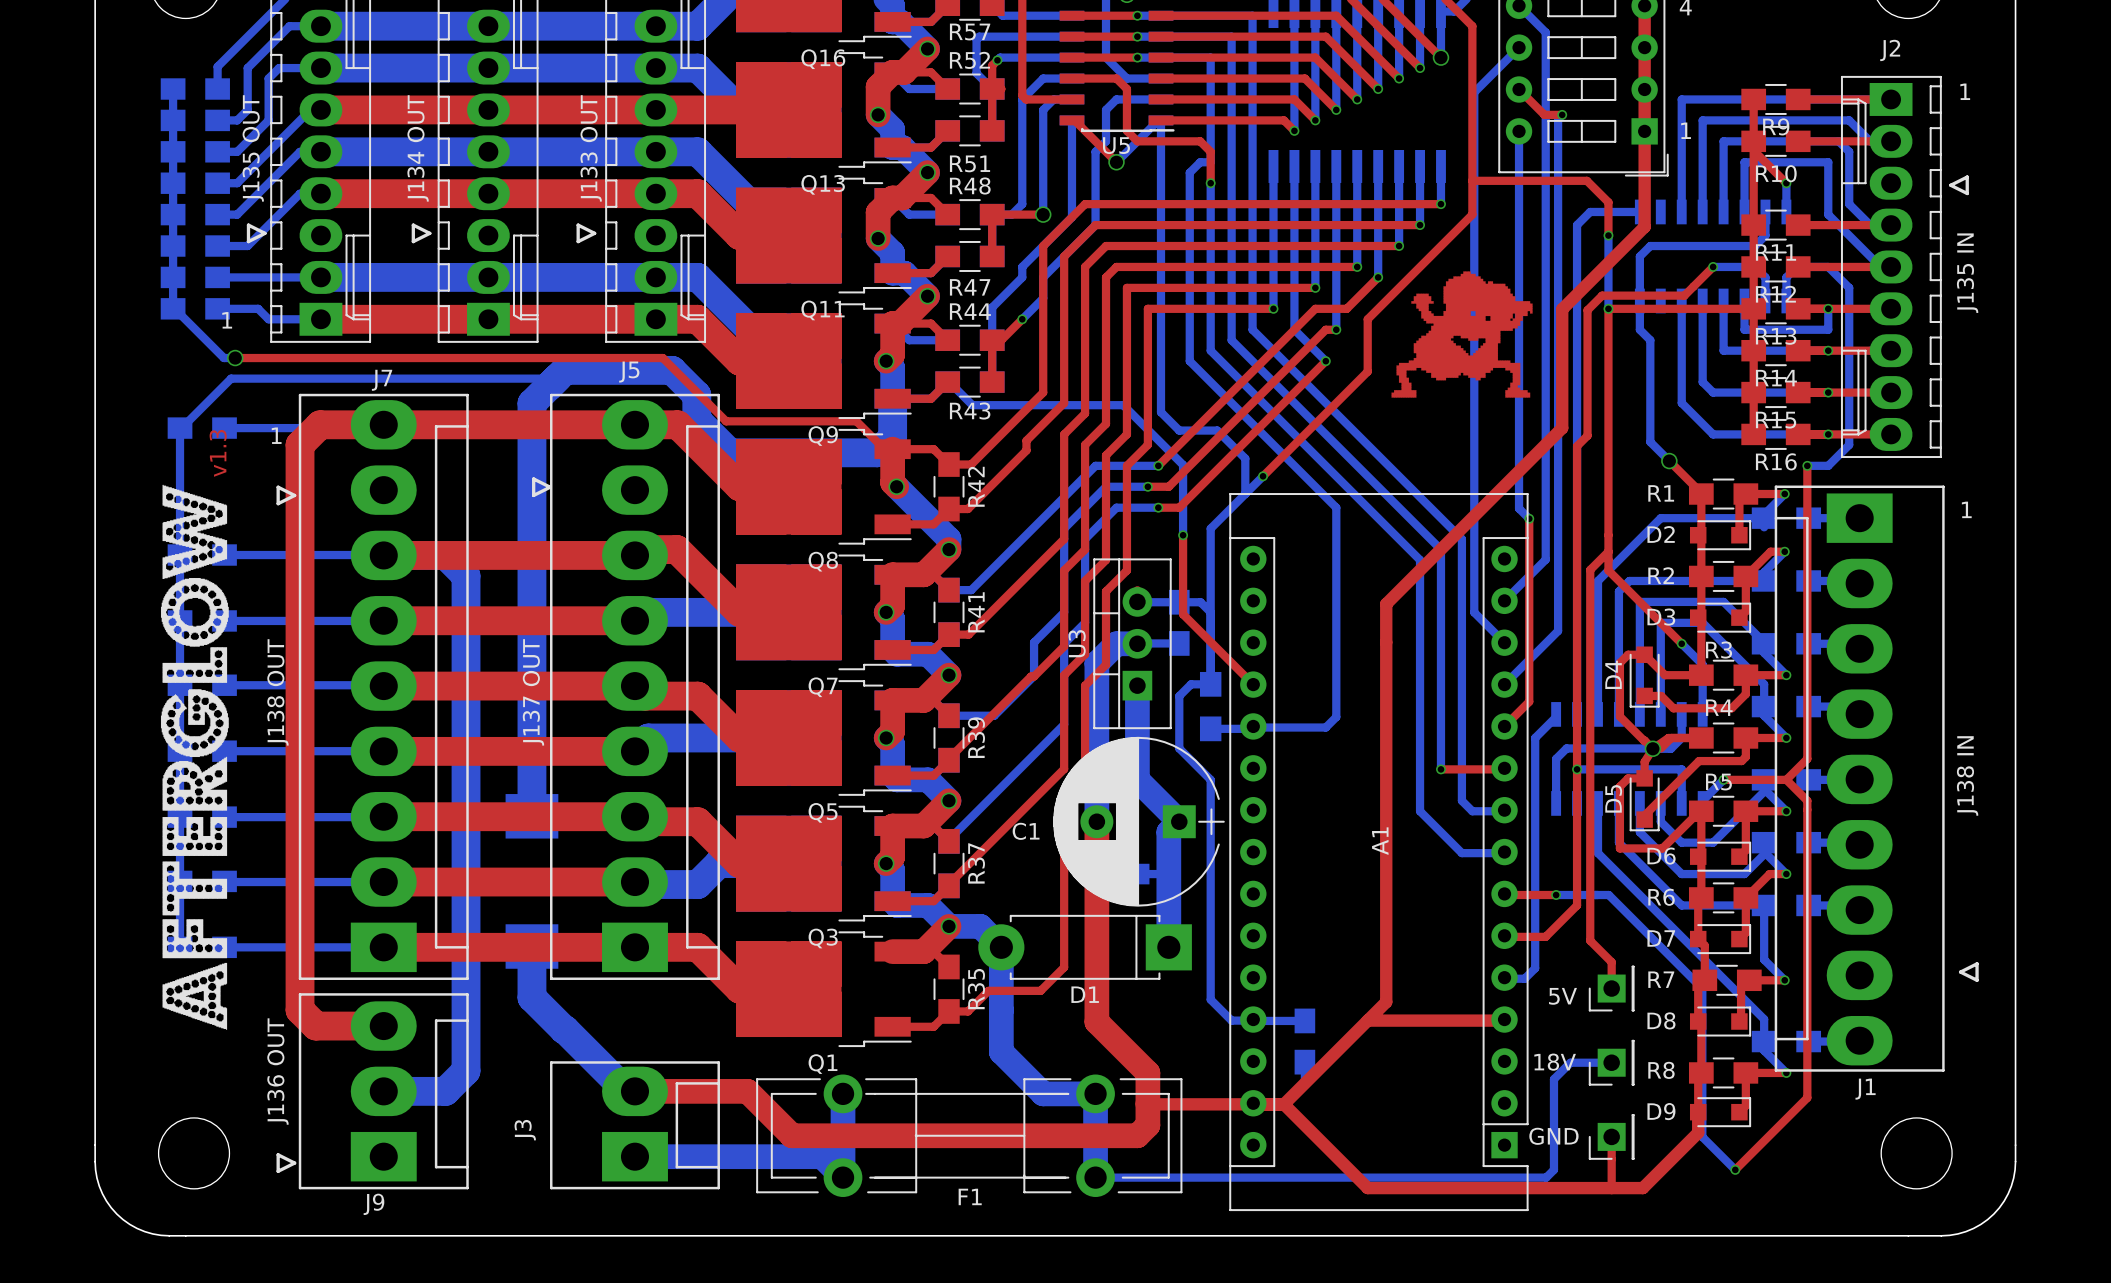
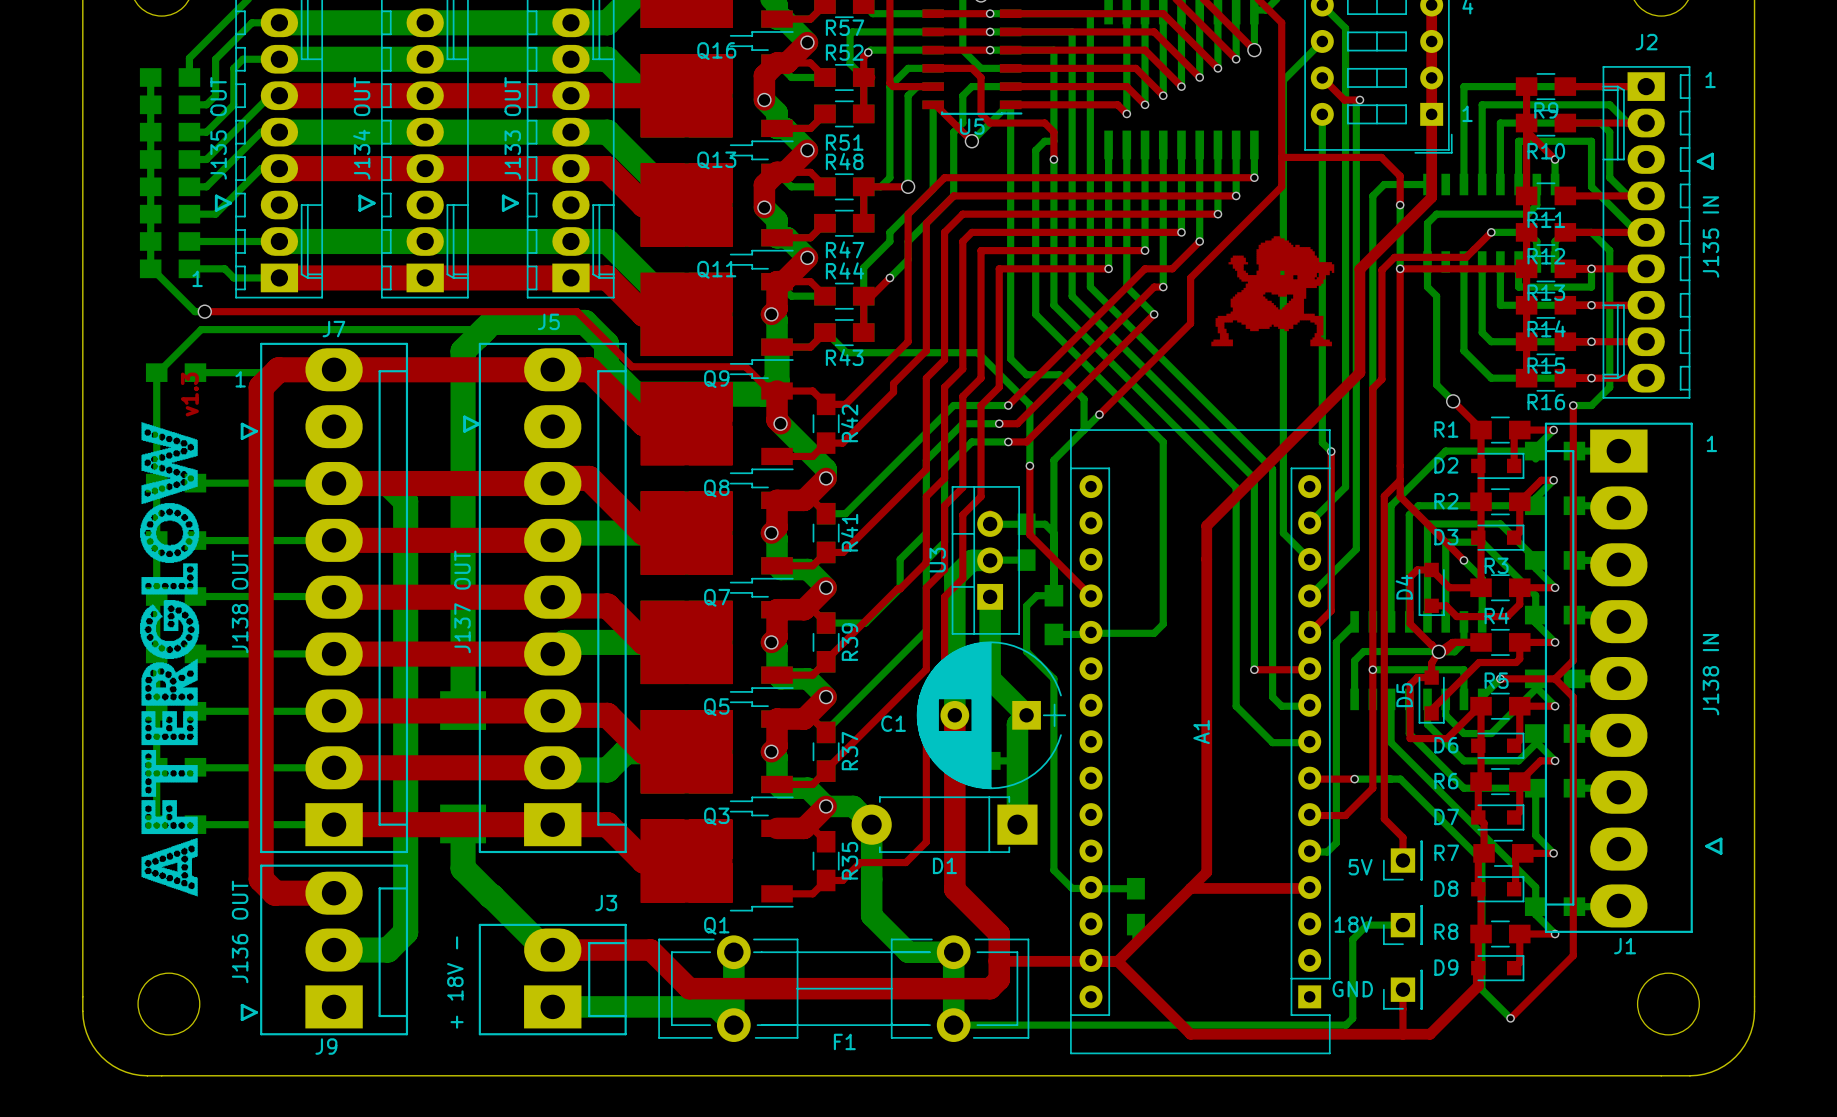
text: none -> + 18V - (455, 982)
J3 name rotation: 0° (525, 1130) -> 90° clockwise (606, 903)
J3 name position: J3 (525, 1130) -> J3 (606, 903)

